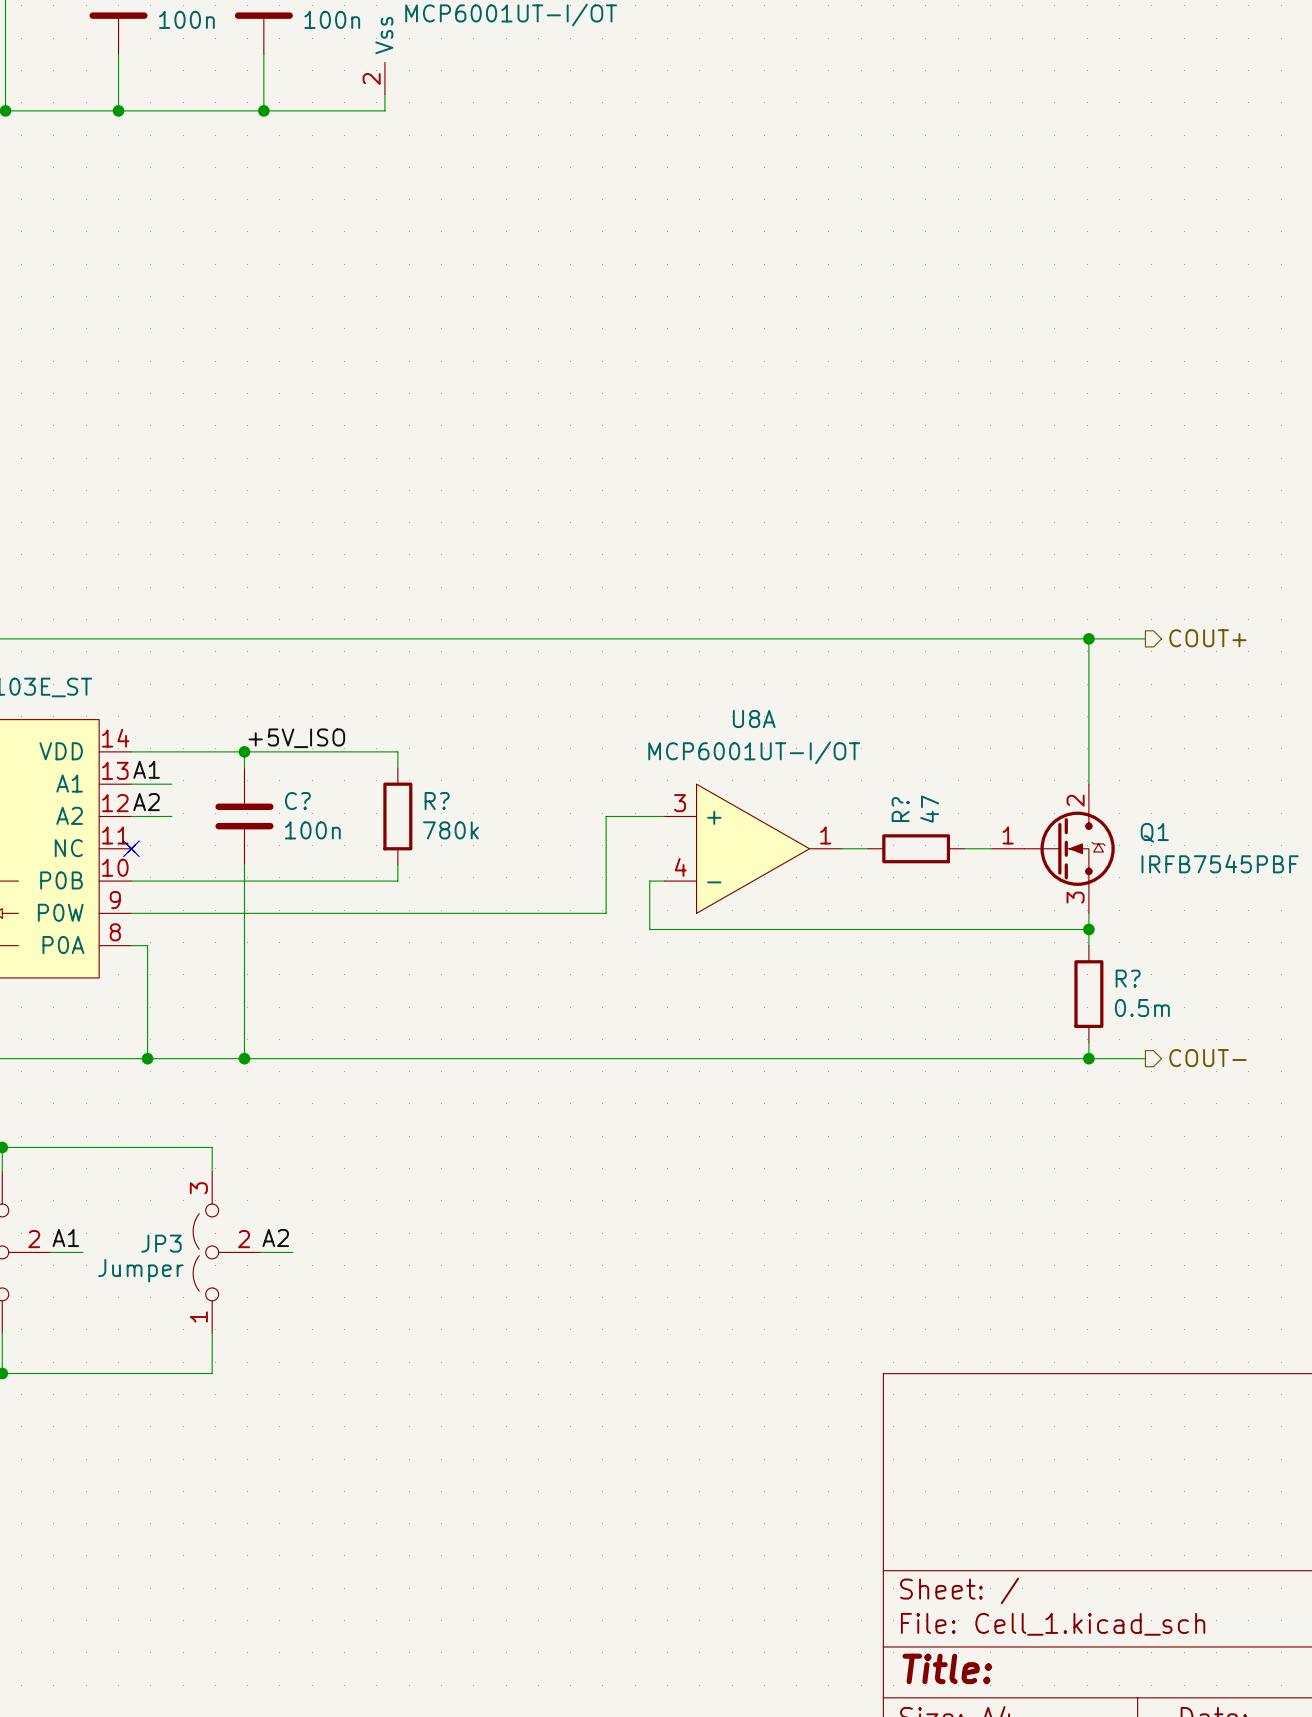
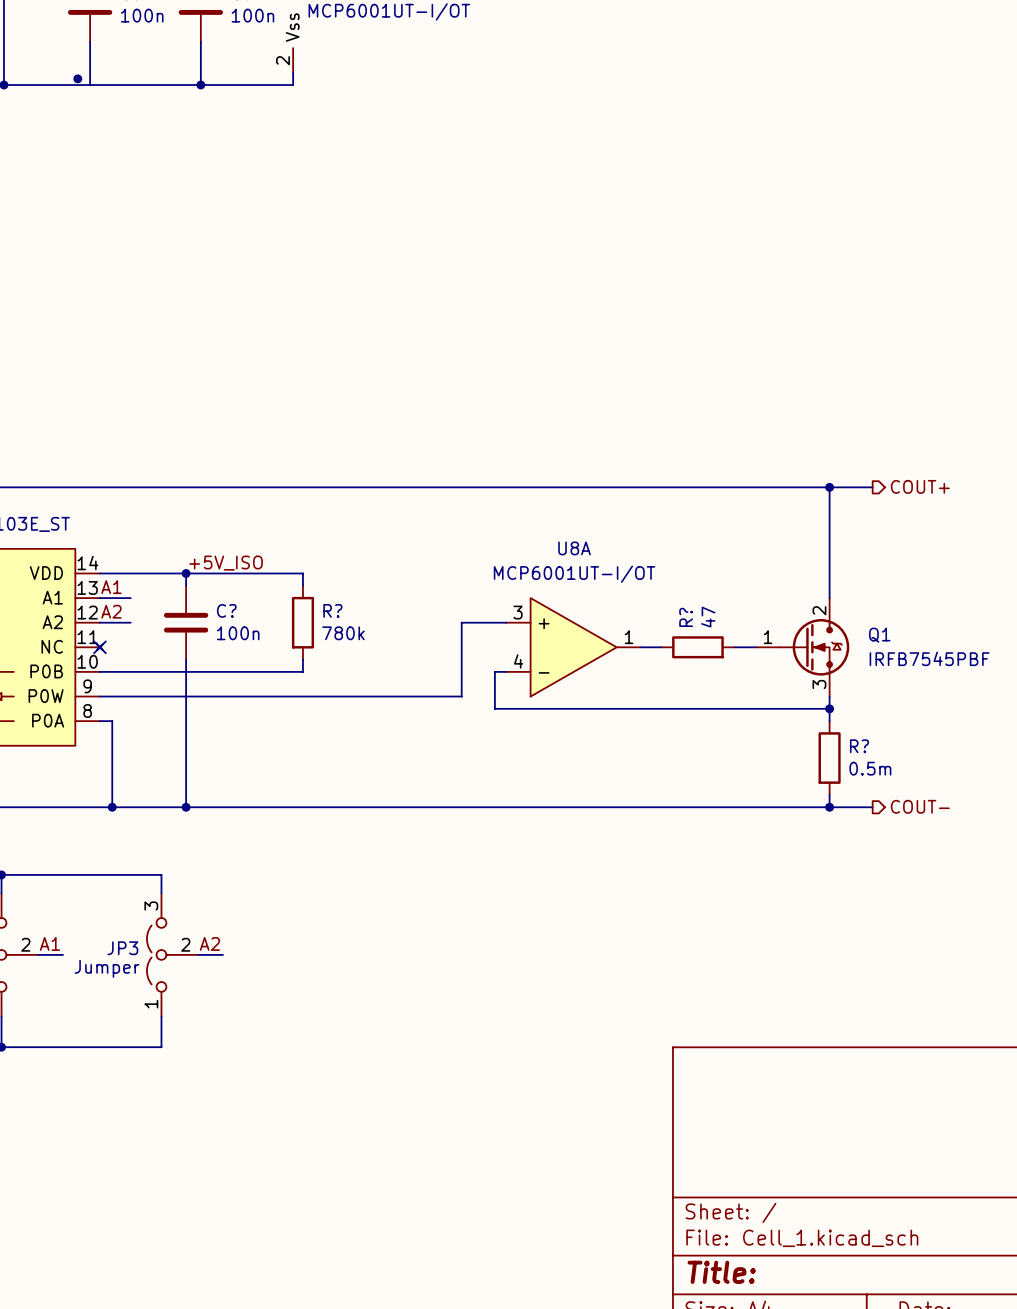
junction position: (118, 110) -> (77, 78)

